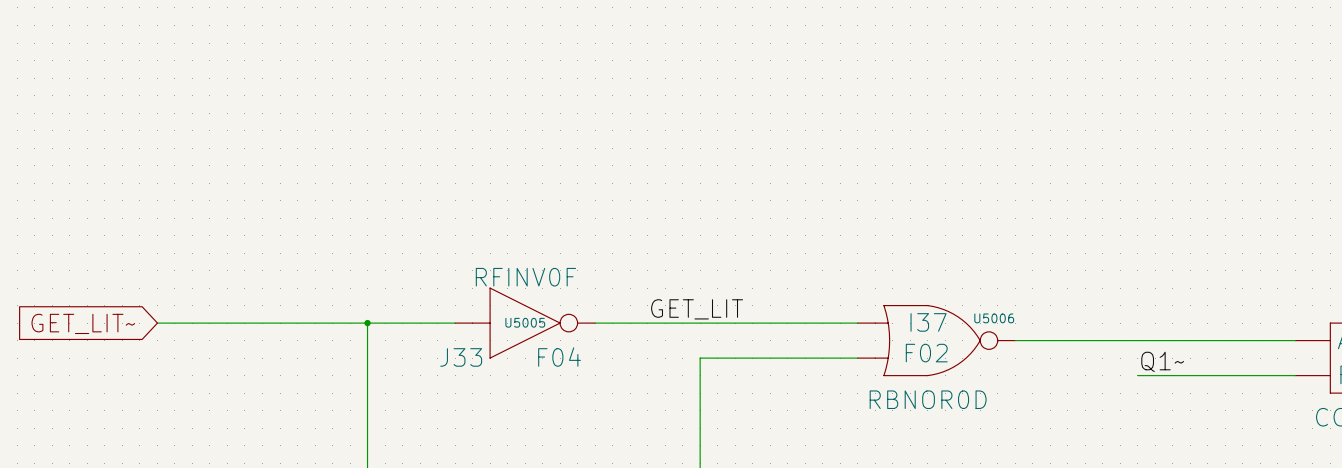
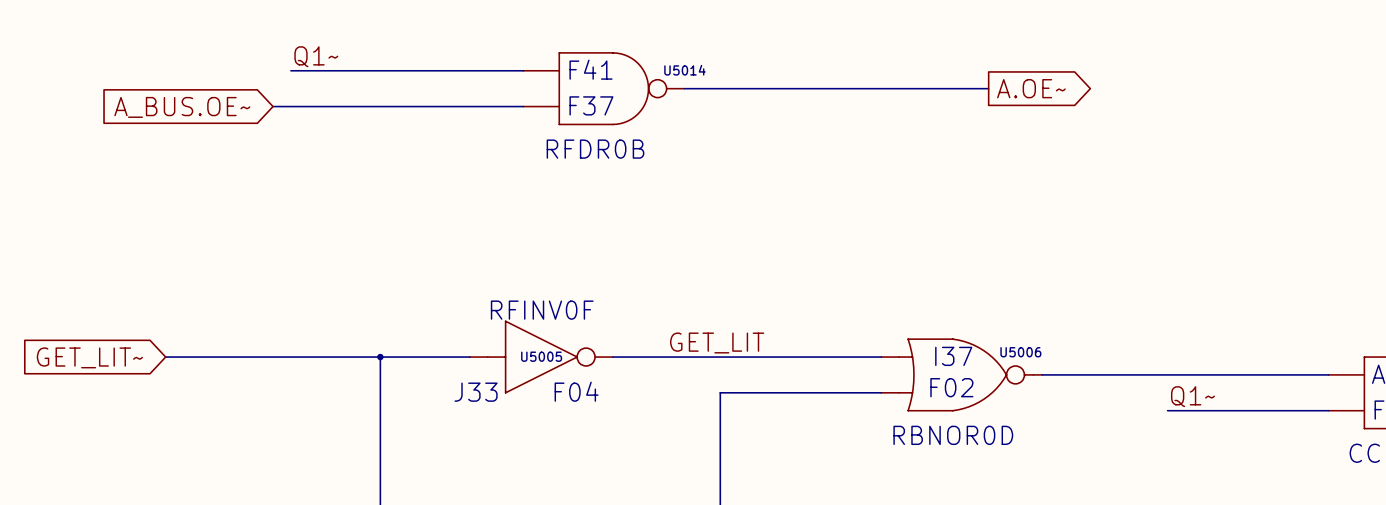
label: none -> Q1~ (316, 56)
wire: none -> (290, 70) (523, 70)
U5014: none -> F37 (604, 88)
wire: none -> (684, 88) (988, 88)
global label: none -> A.OE~ (1031, 88)
global label: none -> A_BUS.OE~ (182, 107)
wire: none -> (273, 106) (523, 106)

